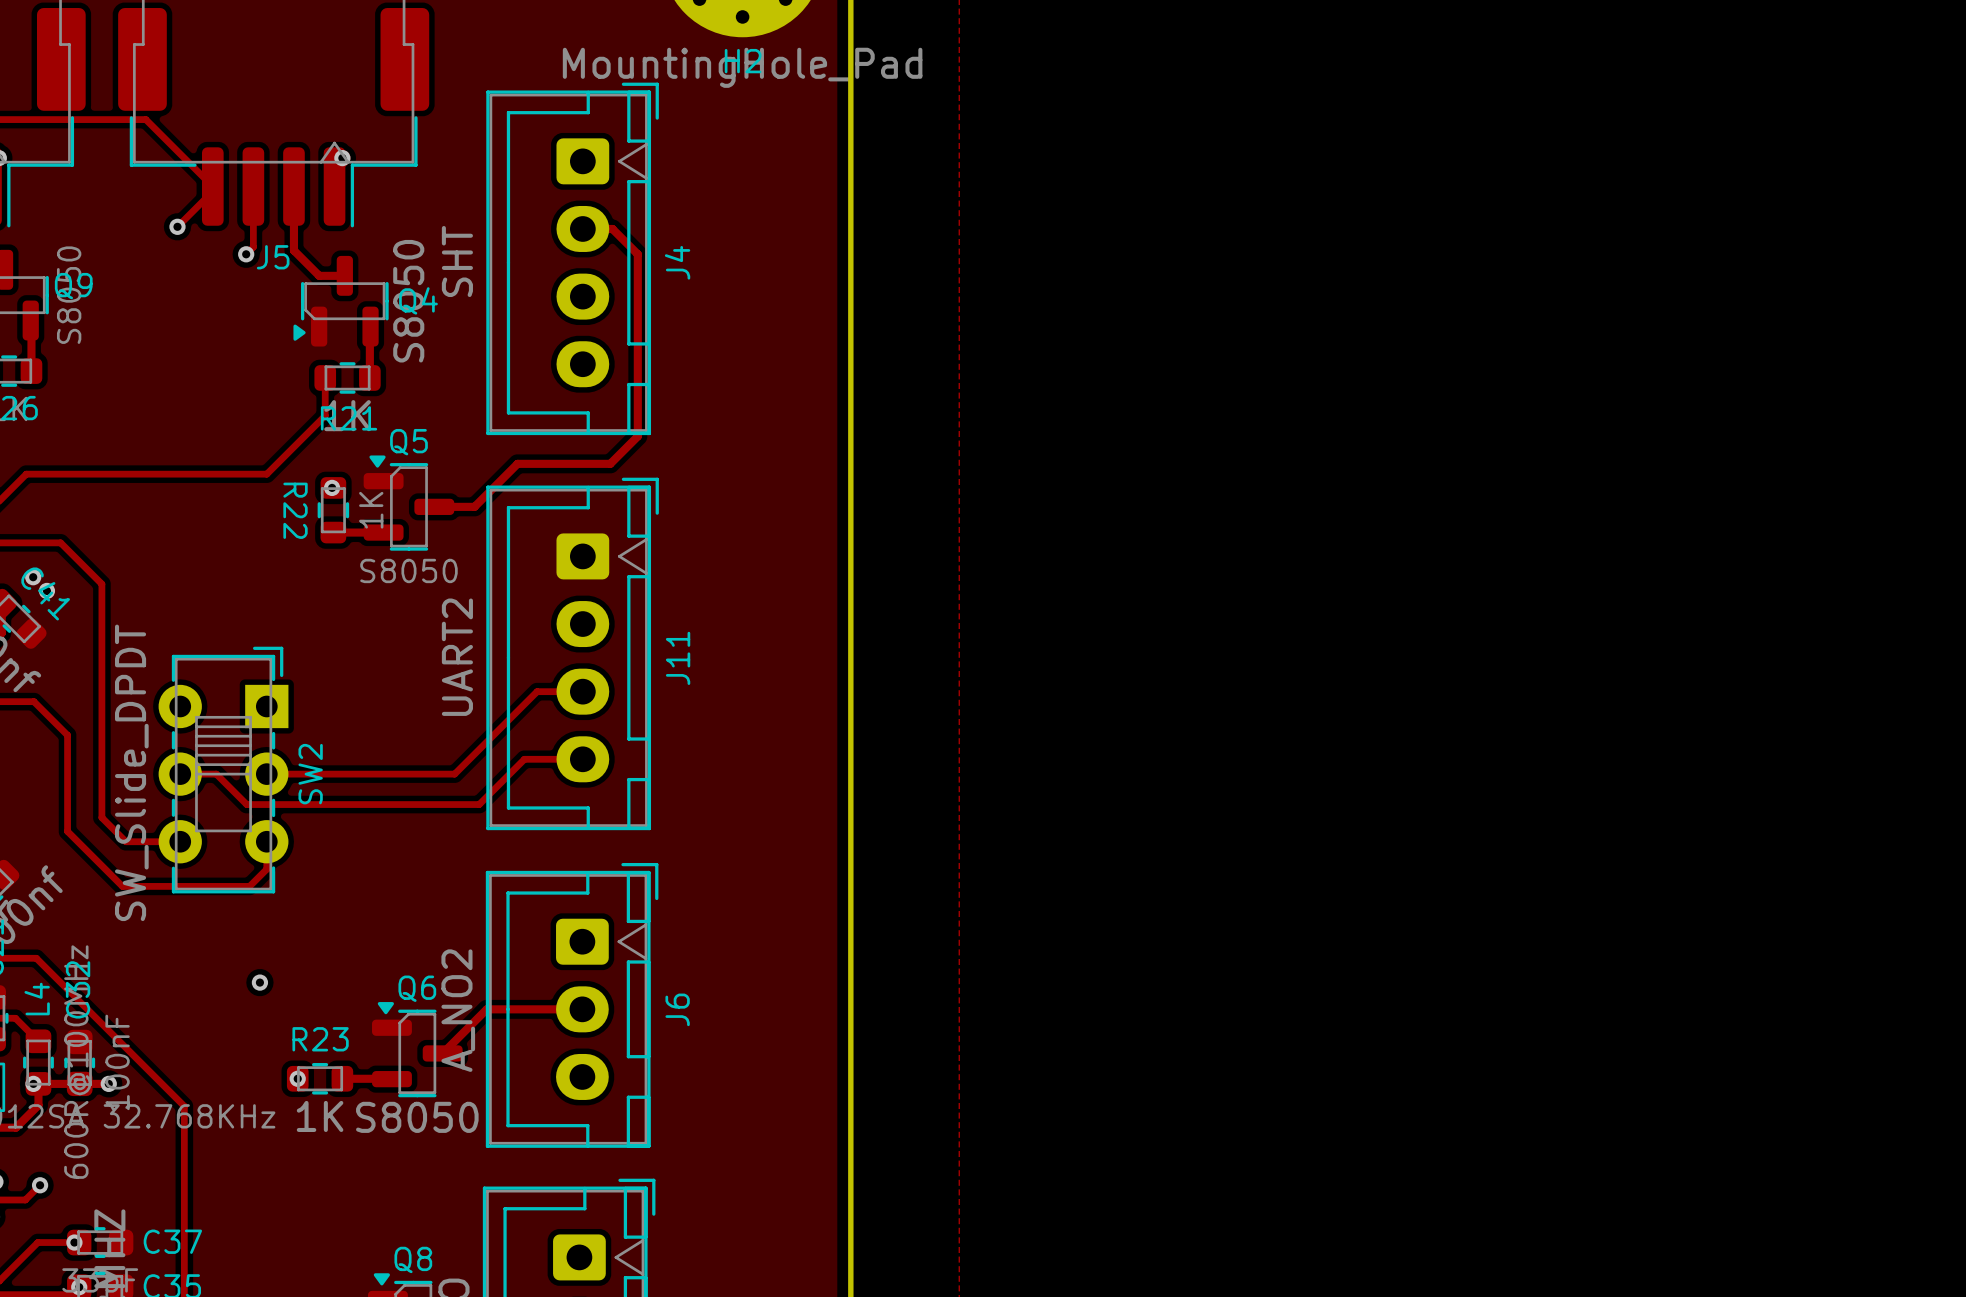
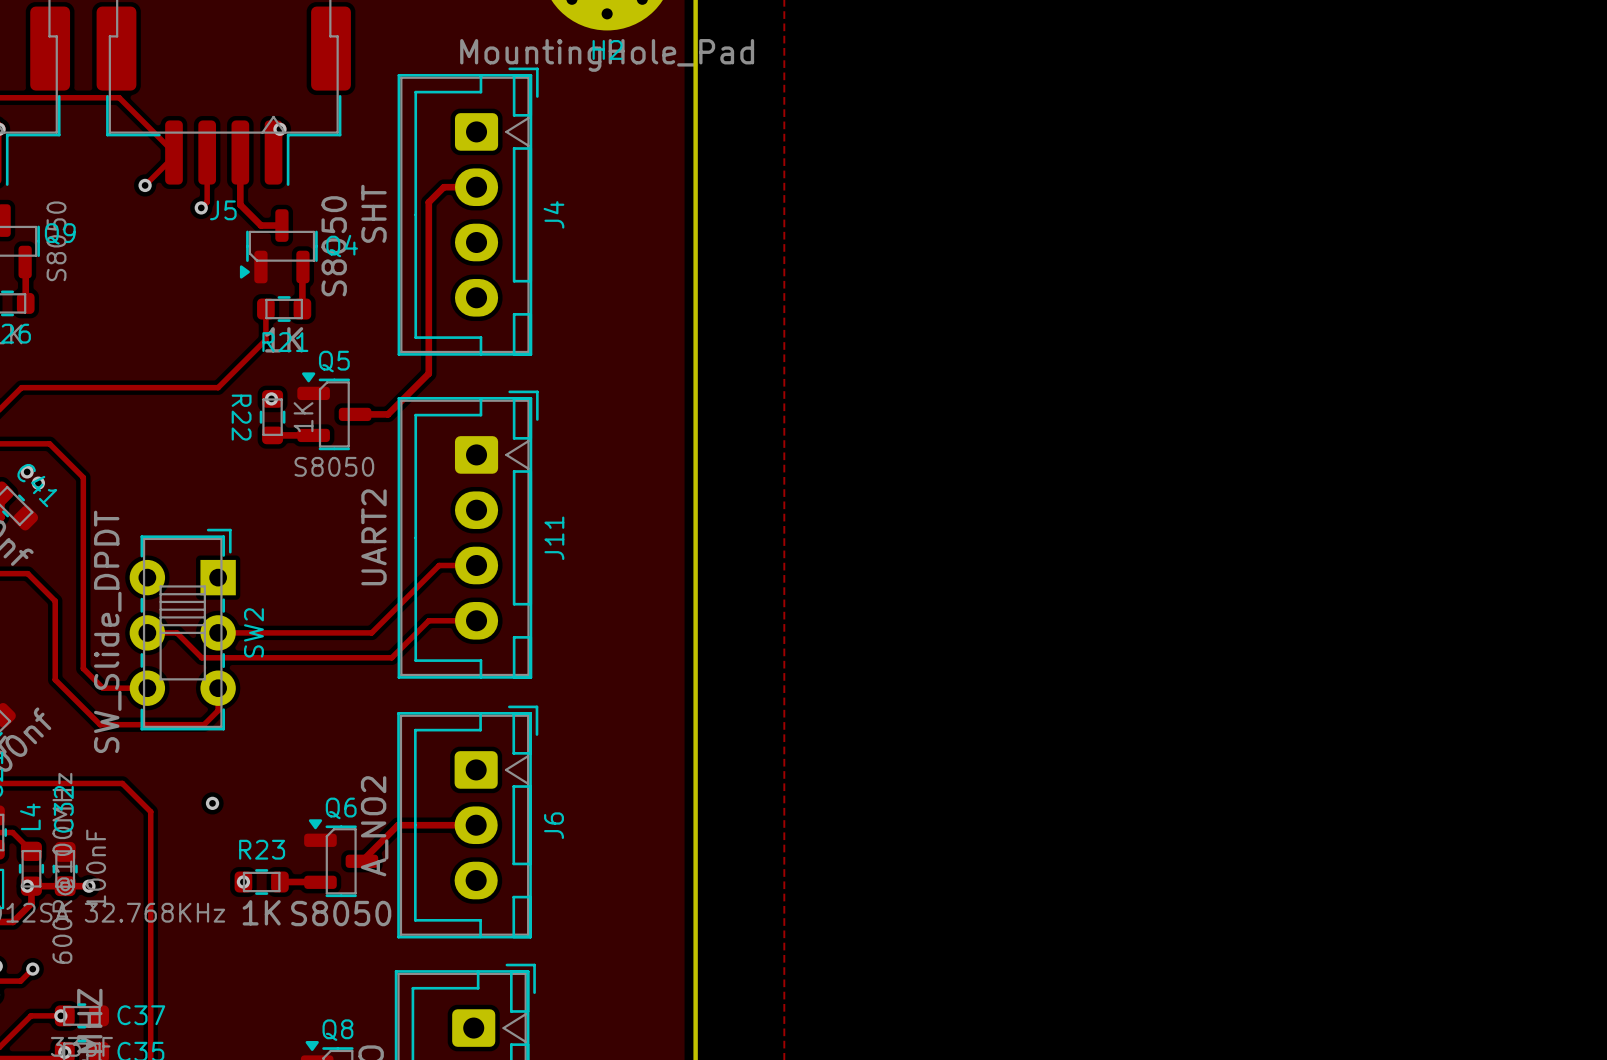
track: (582, 228) (612, 228) (637, 254) (637, 436) (610, 463) (517, 463) -> (476, 187) (443, 187) (428, 202) (428, 373) (423, 379)
track: (36, 958) (184, 1106) -> (29, 783) (122, 783) (150, 811) (150, 904)

